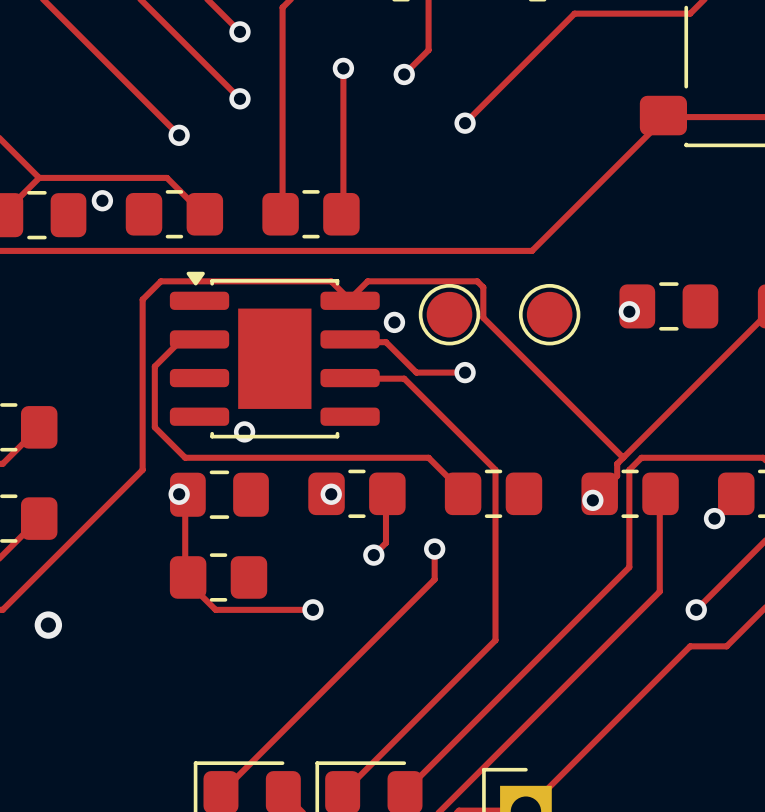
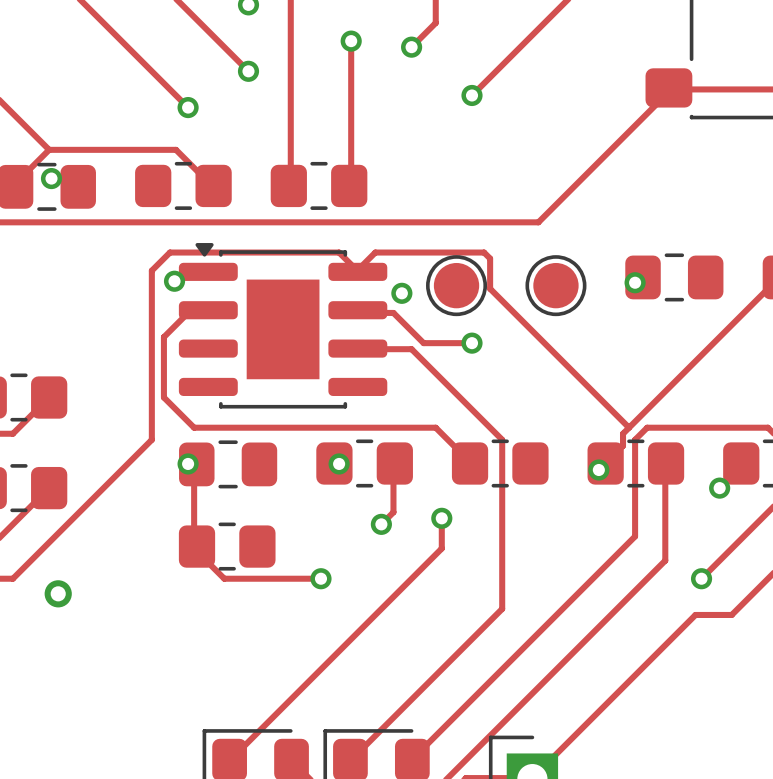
via position: (102, 200) -> (51, 178)
via: none -> (174, 281)
via: (244, 431) -> none

